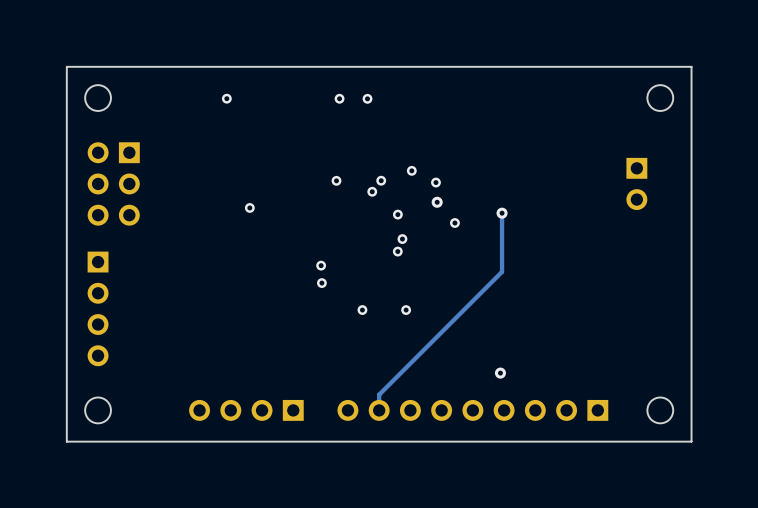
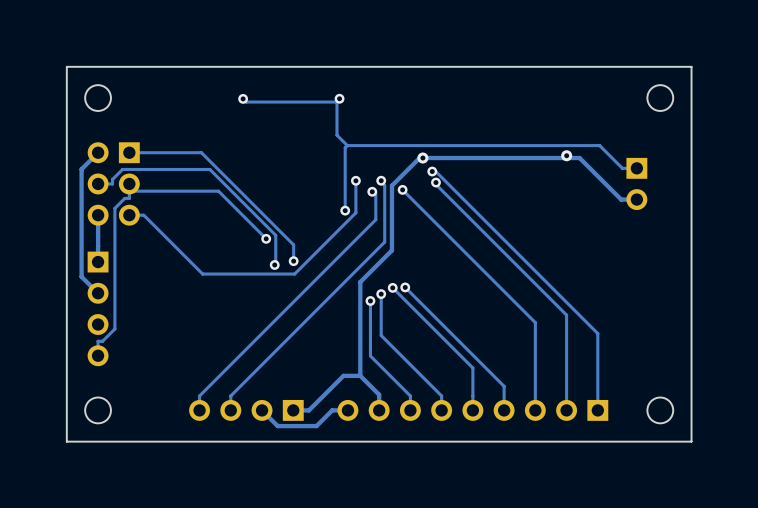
via position: (226, 98) -> (243, 98)
track: none -> (243, 98) (246, 102) (336, 102) (336, 135) (347, 145)
via: (367, 98) -> none
track: none -> (347, 145) (345, 147) (345, 210)
track: none -> (347, 145) (599, 145) (622, 168) (636, 168)
track: none -> (98, 152) (81, 169) (81, 276) (98, 293)
track: none -> (129, 152) (201, 152) (293, 244) (293, 261)
via: none -> (566, 155)
via: (411, 170) -> none
track: none -> (432, 171) (435, 171) (597, 333) (597, 410)
via: none -> (432, 171)
via: (336, 180) -> none
track: none -> (355, 180) (355, 212) (294, 274) (202, 274) (143, 215) (129, 215)
via: none -> (355, 180)
track: none -> (380, 181) (384, 185) (384, 242) (230, 395) (230, 410)
track: none -> (98, 183) (112, 183) (112, 179) (122, 169) (209, 169) (275, 235) (274, 264)
track: none -> (129, 183) (129, 198) (124, 198) (114, 208) (114, 328) (102, 341) (98, 341) (98, 355)
track: none -> (436, 184) (566, 315) (566, 410)
track: none -> (402, 189) (535, 322) (535, 410)
via: none -> (402, 189)
track: none -> (129, 191) (218, 191) (266, 238)
track: none -> (375, 193) (375, 219) (199, 395) (199, 410)
track: none -> (636, 199) (621, 199) (579, 158) (419, 158) (391, 185) (391, 250) (360, 282) (360, 375)
via position: (437, 202) -> (422, 158)
via: (249, 207) -> none
via: none -> (345, 210)
track: (502, 213) (502, 271) (379, 394) -> (360, 375) (379, 394)
via: (502, 213) -> none
via: (397, 214) -> none
via: (454, 223) -> none
via: none -> (266, 238)
via: (402, 239) -> none
via: (397, 251) -> none
via: none -> (293, 261)
via: none -> (274, 264)
via: (321, 265) -> none
via: (321, 283) -> none
track: none -> (392, 287) (472, 368) (472, 410)
via: none -> (392, 287)
track: none -> (405, 287) (504, 386) (504, 410)
via: none -> (405, 287)
track: none -> (381, 294) (381, 335) (441, 395) (441, 410)
via: none -> (381, 294)
track: none -> (370, 300) (370, 356) (410, 395) (410, 410)
via position: (362, 310) -> (370, 300)
via: (406, 310) -> none
via: (500, 373) -> none
track: none -> (360, 375) (343, 375) (308, 410) (293, 410)
track: none -> (347, 410) (332, 410) (316, 426) (277, 426) (262, 410)

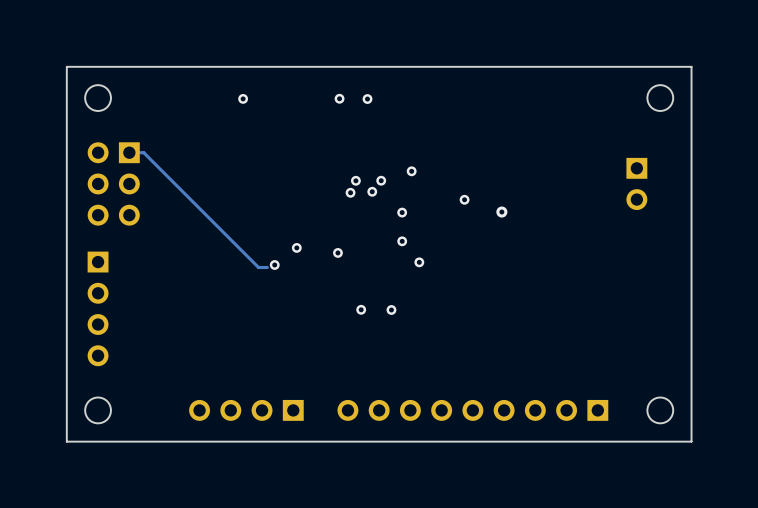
track: (243, 98) (246, 102) (336, 102) (336, 135) (347, 145) -> none
via: none -> (367, 99)
track: (347, 145) (345, 147) (345, 210) -> none
track: (347, 145) (599, 145) (622, 168) (636, 168) -> none
track: (98, 152) (81, 169) (81, 276) (98, 293) -> none
track: (143, 152) (201, 152) (293, 244) (293, 261) -> (143, 152) (258, 267) (267, 267)
via: (566, 155) -> none
via: (422, 158) -> none
via: none -> (411, 171)
track: (432, 171) (435, 171) (597, 333) (597, 410) -> none
via: (432, 171) -> none
track: (355, 180) (355, 212) (294, 274) (202, 274) (143, 215) (129, 215) -> none
track: (380, 181) (384, 185) (384, 242) (230, 395) (230, 410) -> none
via: (435, 182) -> none
track: (98, 183) (112, 183) (112, 179) (122, 169) (209, 169) (275, 235) (274, 264) -> none
track: (129, 183) (129, 198) (124, 198) (114, 208) (114, 328) (102, 341) (98, 341) (98, 355) -> none
track: (436, 184) (566, 315) (566, 410) -> none
track: (402, 189) (535, 322) (535, 410) -> none
via: (402, 189) -> none
track: (129, 191) (218, 191) (266, 238) -> none
track: (375, 193) (375, 219) (199, 395) (199, 410) -> none
via: none -> (464, 199)
track: (636, 199) (621, 199) (579, 158) (419, 158) (391, 185) (391, 250) (360, 282) (360, 375) -> none
via position: (345, 210) -> (350, 192)
via: none -> (402, 212)
via: none -> (501, 212)
via: (266, 238) -> none
via: none -> (402, 241)
via: none -> (337, 252)
via position: (293, 261) -> (296, 247)
via: none -> (419, 262)
track: (392, 287) (472, 368) (472, 410) -> none
via: (392, 287) -> none
track: (405, 287) (504, 386) (504, 410) -> none
via: (405, 287) -> none
track: (381, 294) (381, 335) (441, 395) (441, 410) -> none
via: (381, 294) -> none
track: (370, 300) (370, 356) (410, 395) (410, 410) -> none
via: (370, 300) -> none
via: none -> (361, 309)
via: none -> (391, 309)
track: (360, 375) (343, 375) (308, 410) (293, 410) -> none
track: (360, 375) (379, 394) (379, 410) -> none
track: (347, 410) (332, 410) (316, 426) (277, 426) (262, 410) -> none

